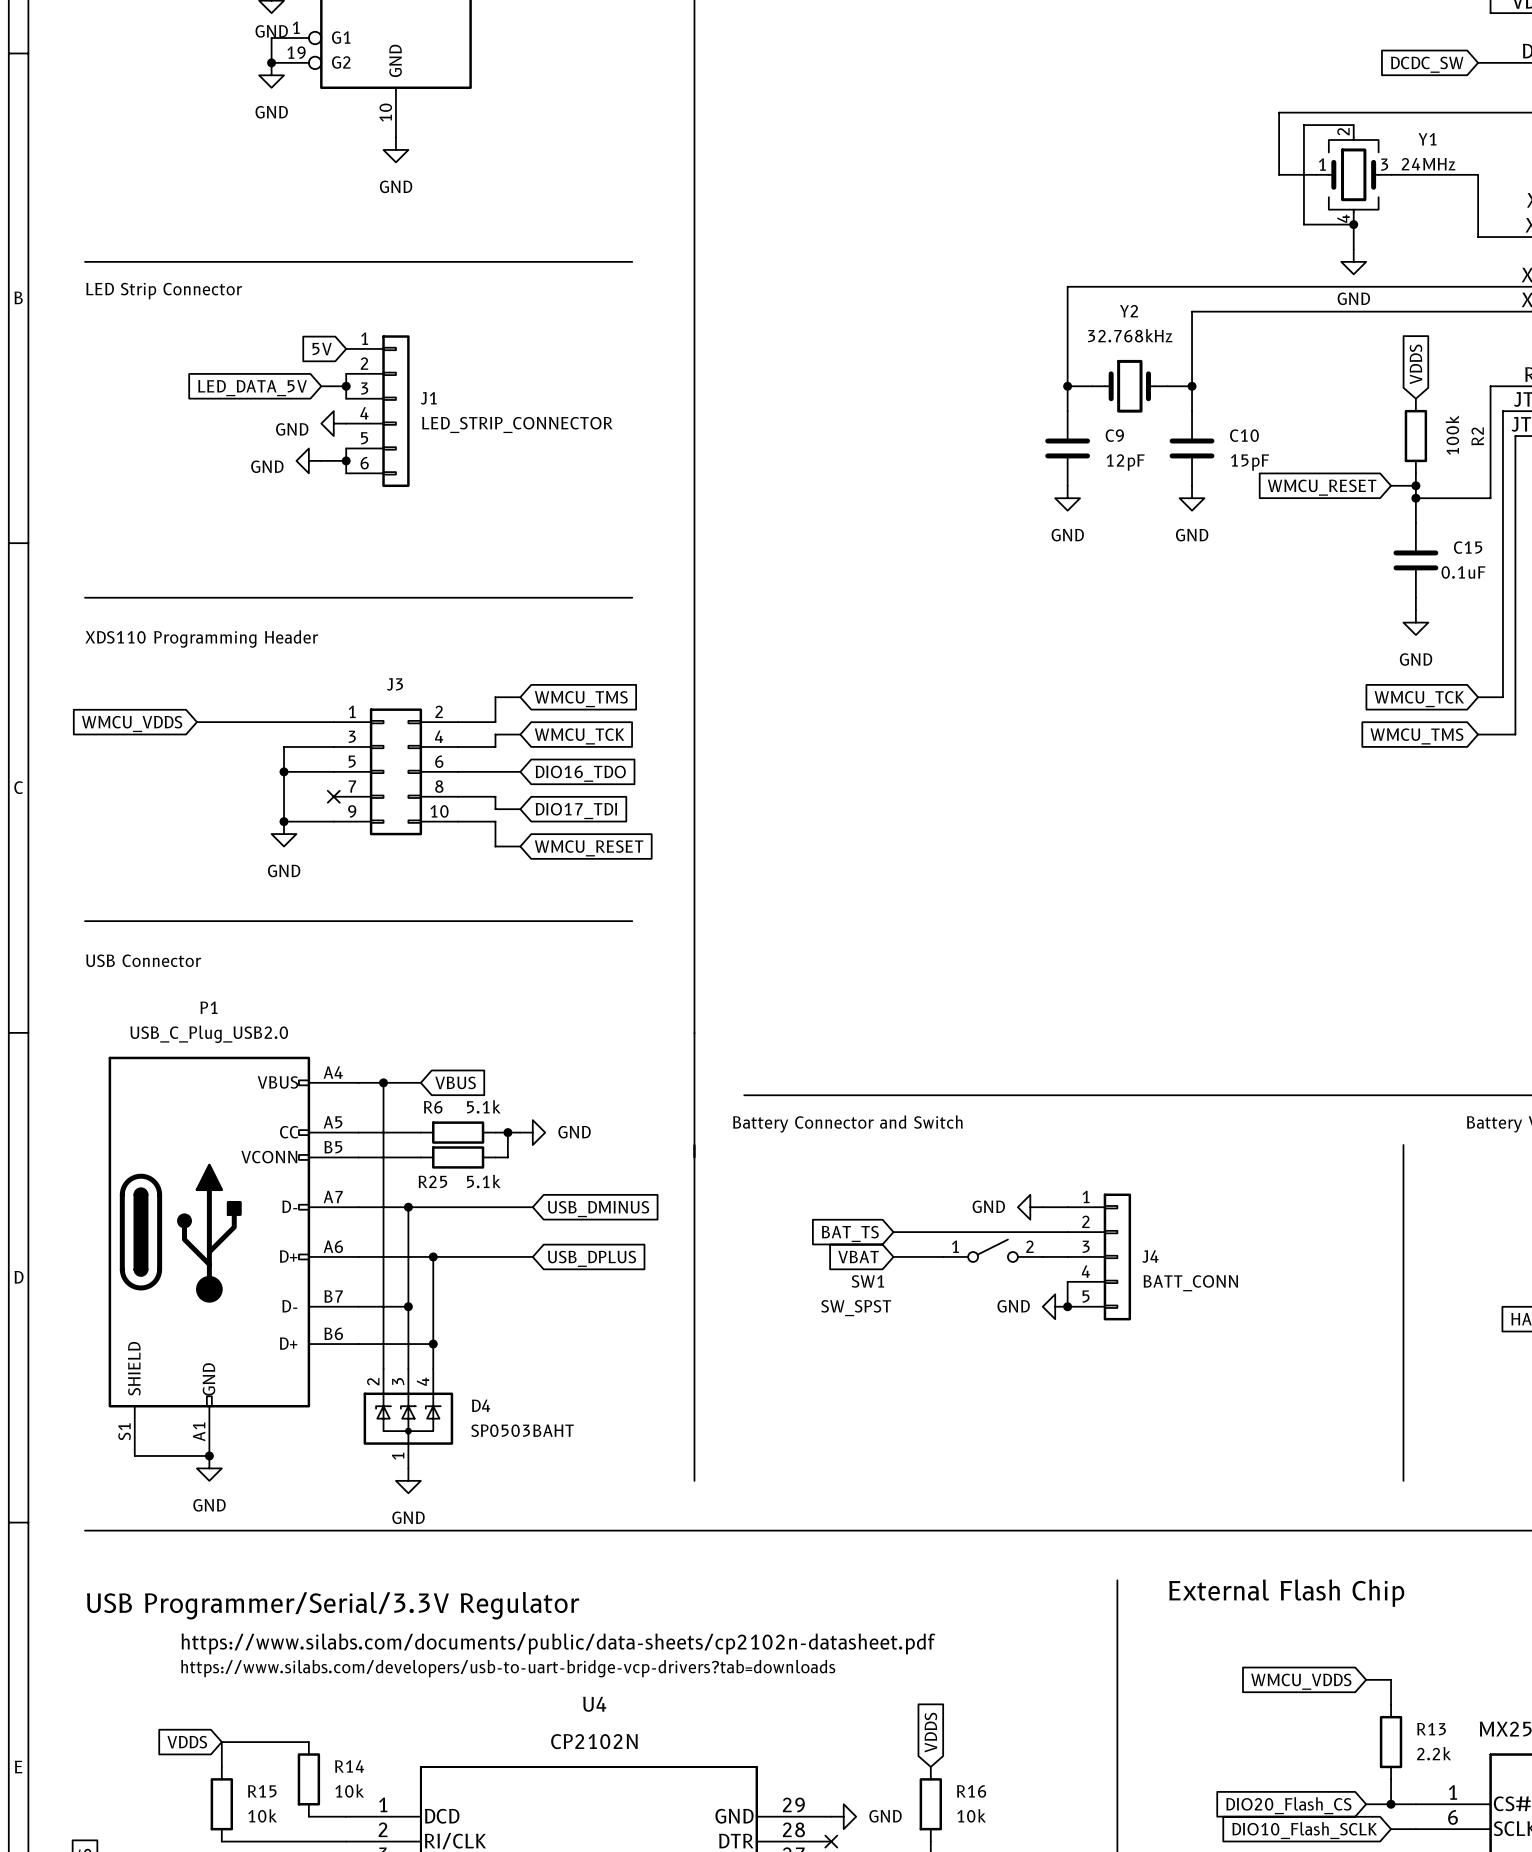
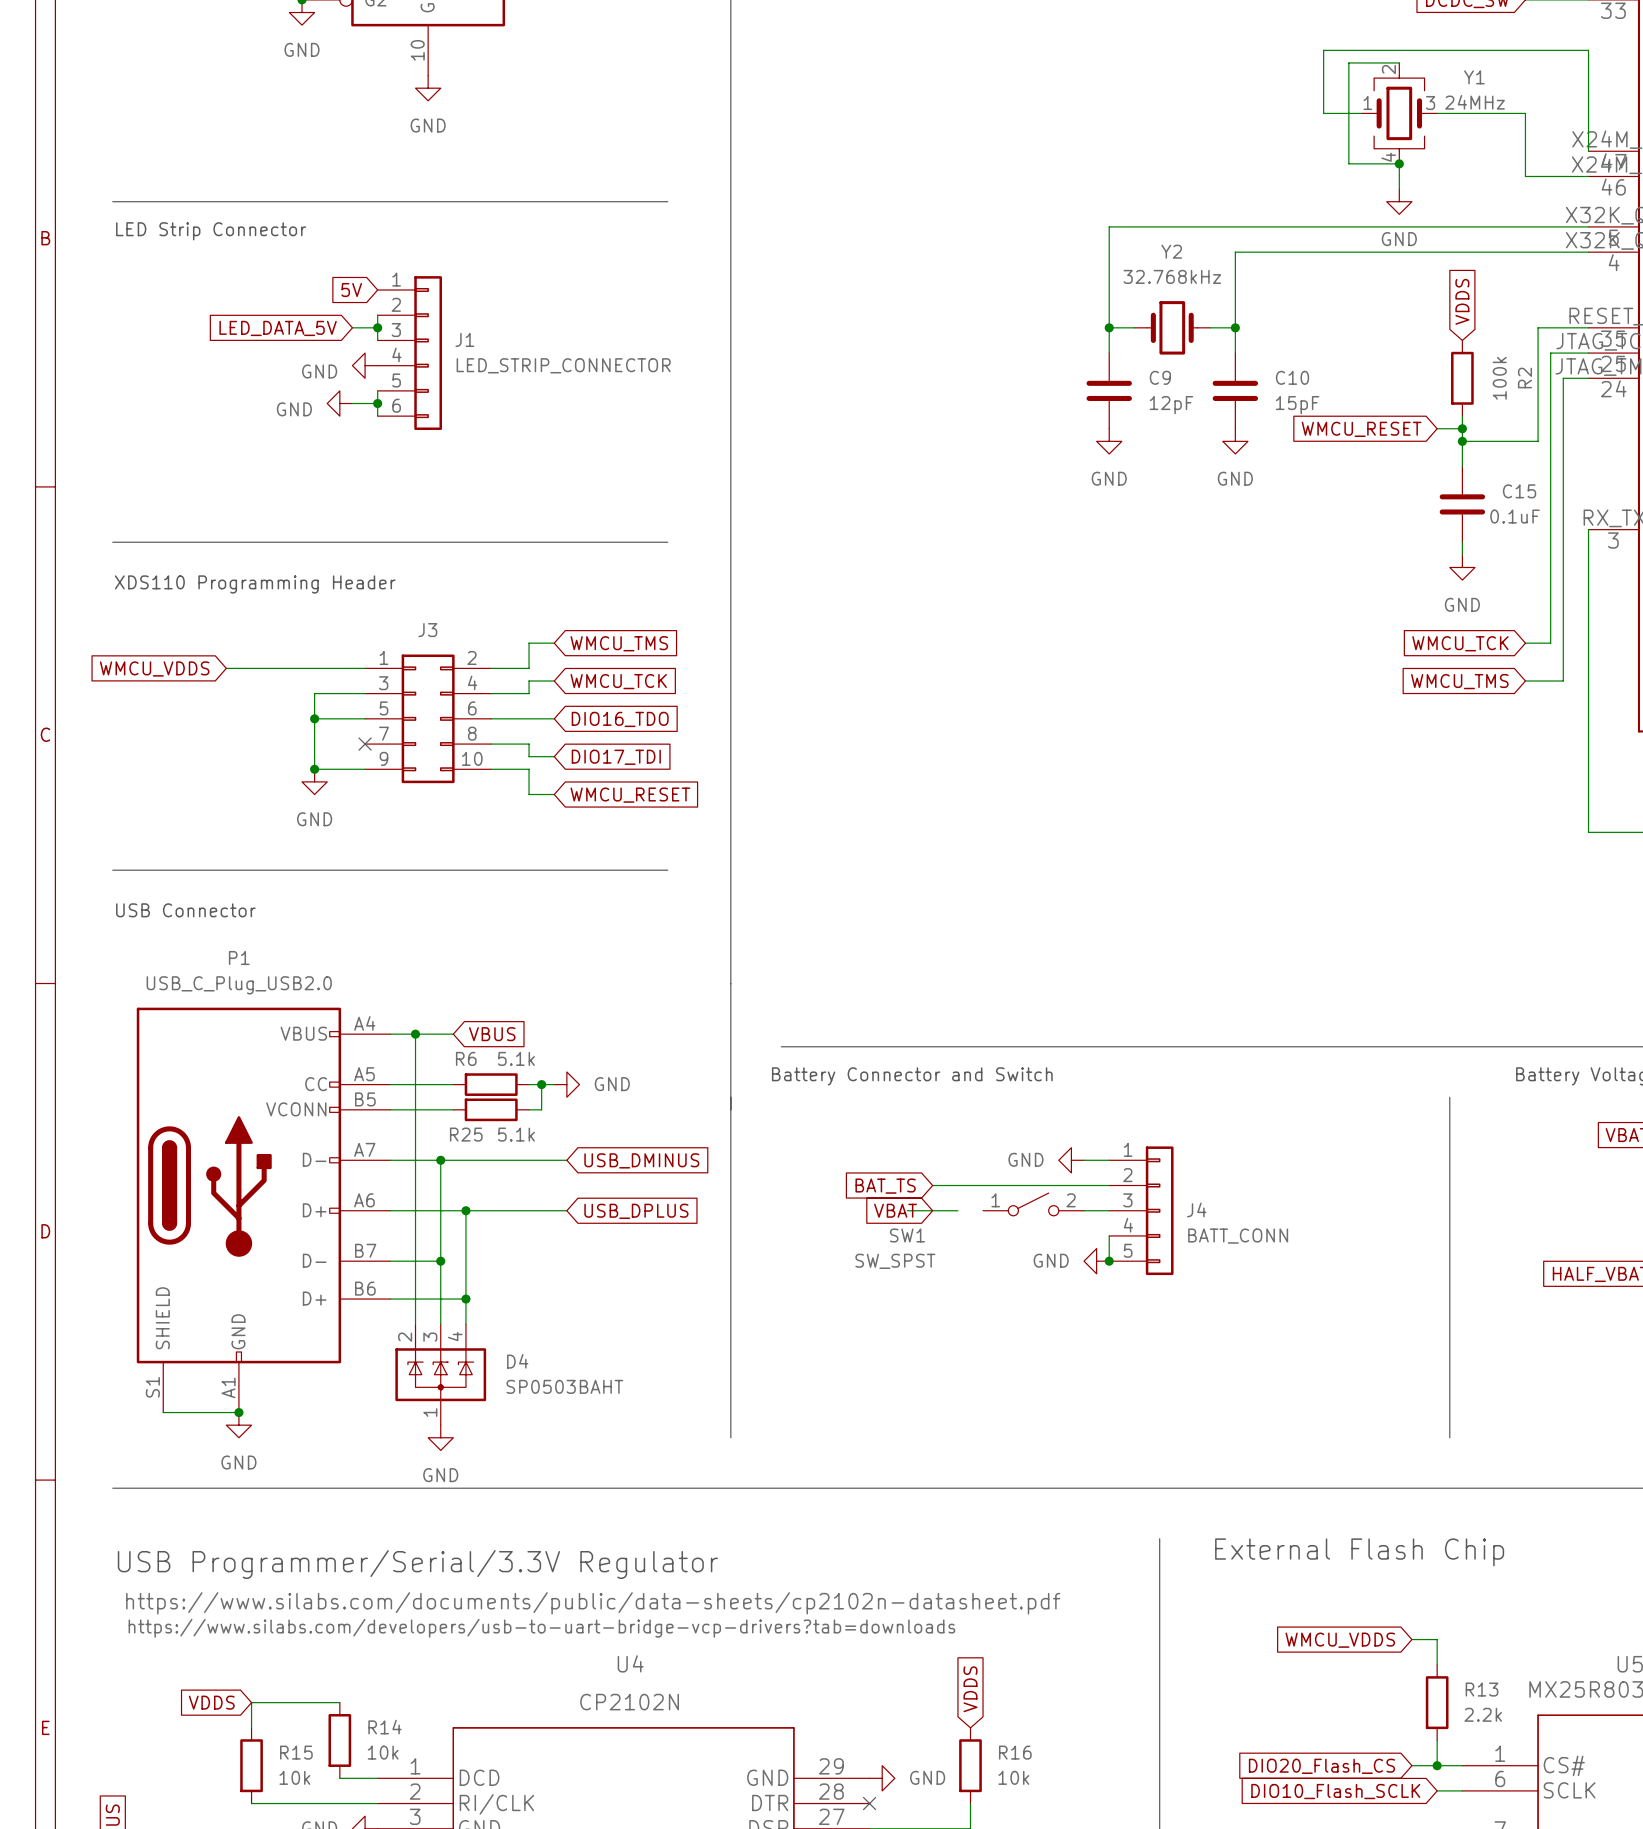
wire: (918, 1256) (943, 1256) -> (907, 1210) (932, 1210)

